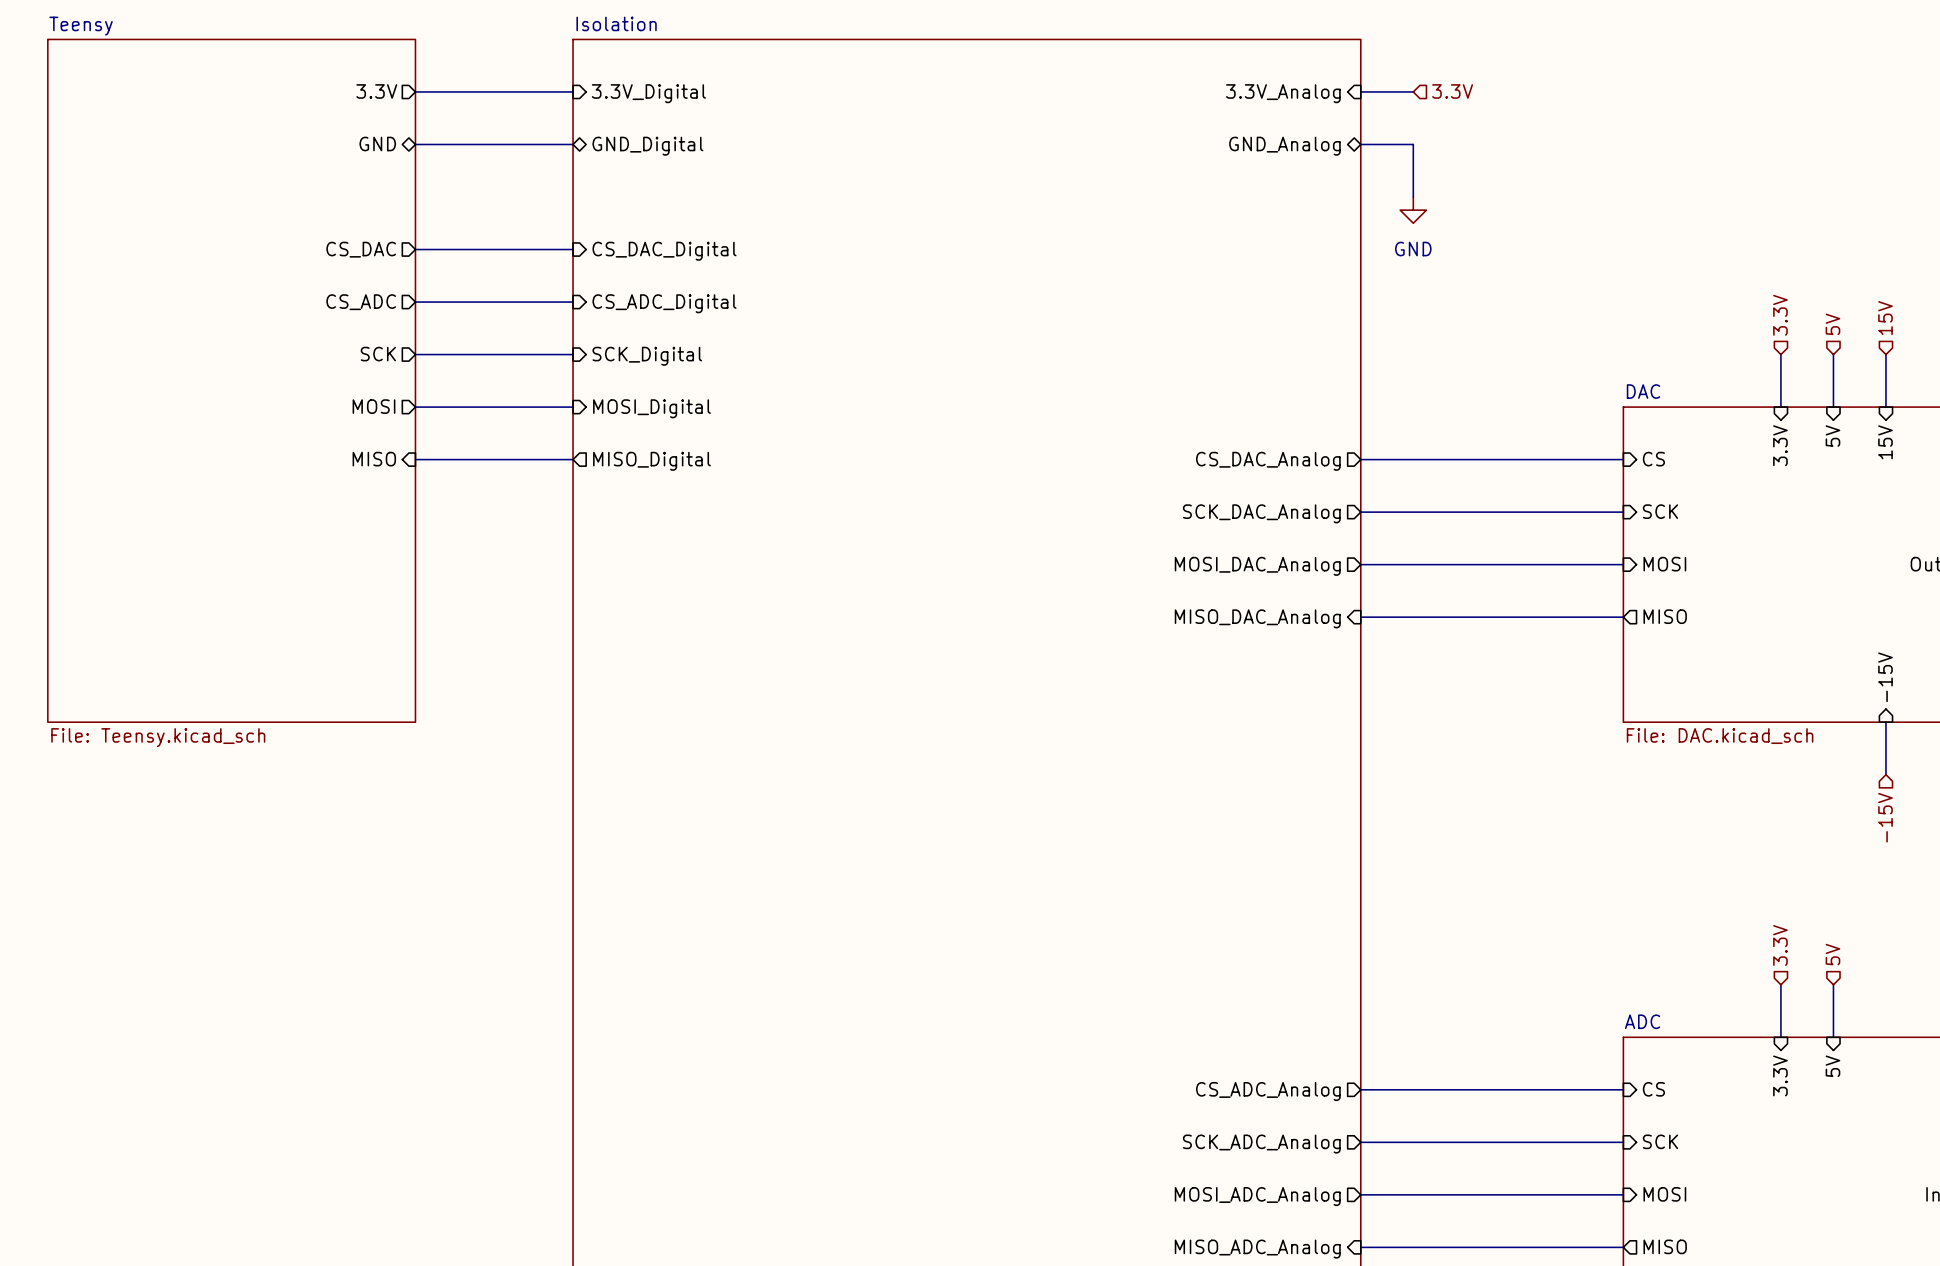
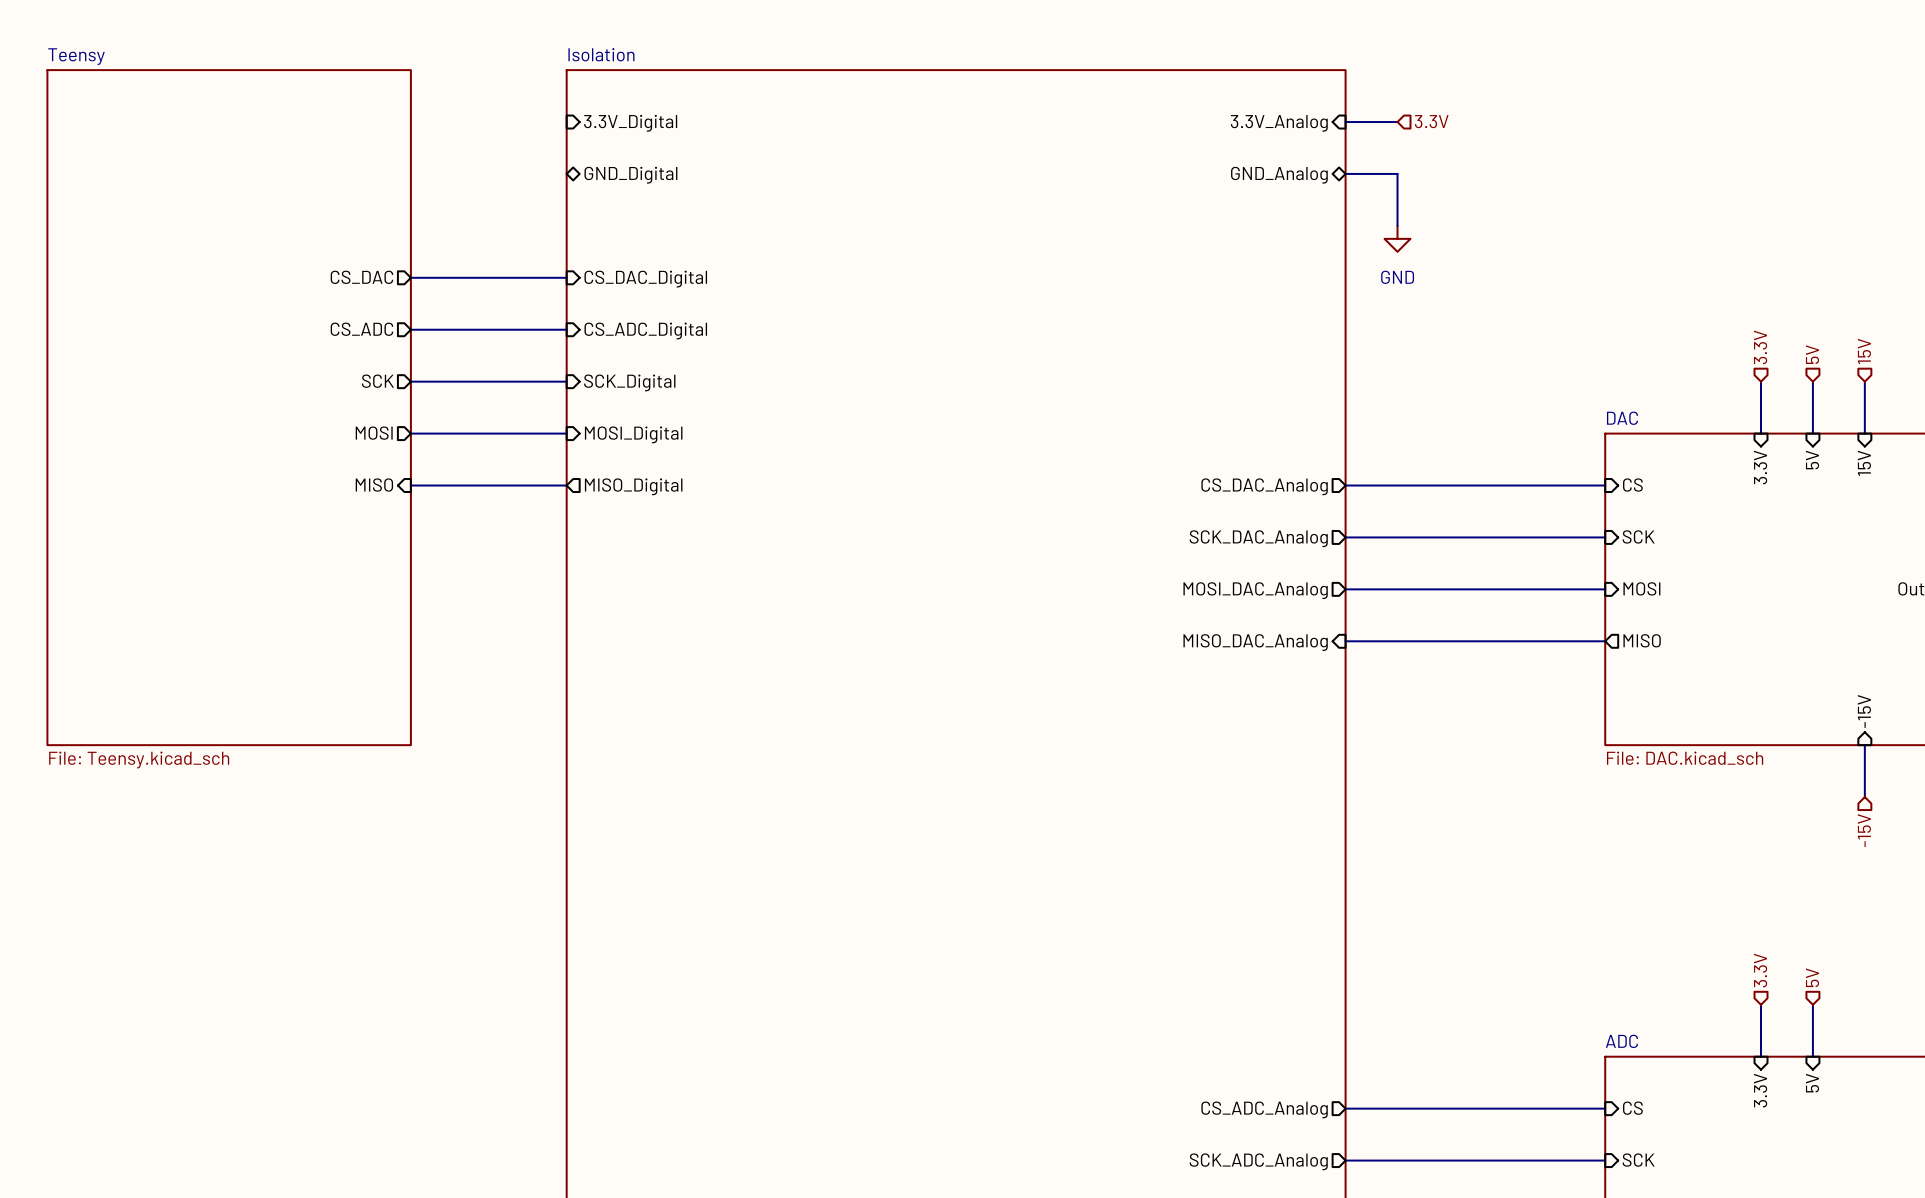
sheet pin: 3.3V (376, 91) -> none
wire: (415, 91) (573, 91) -> none
sheet pin: GND (377, 144) -> none
wire: (415, 144) (573, 144) -> none

